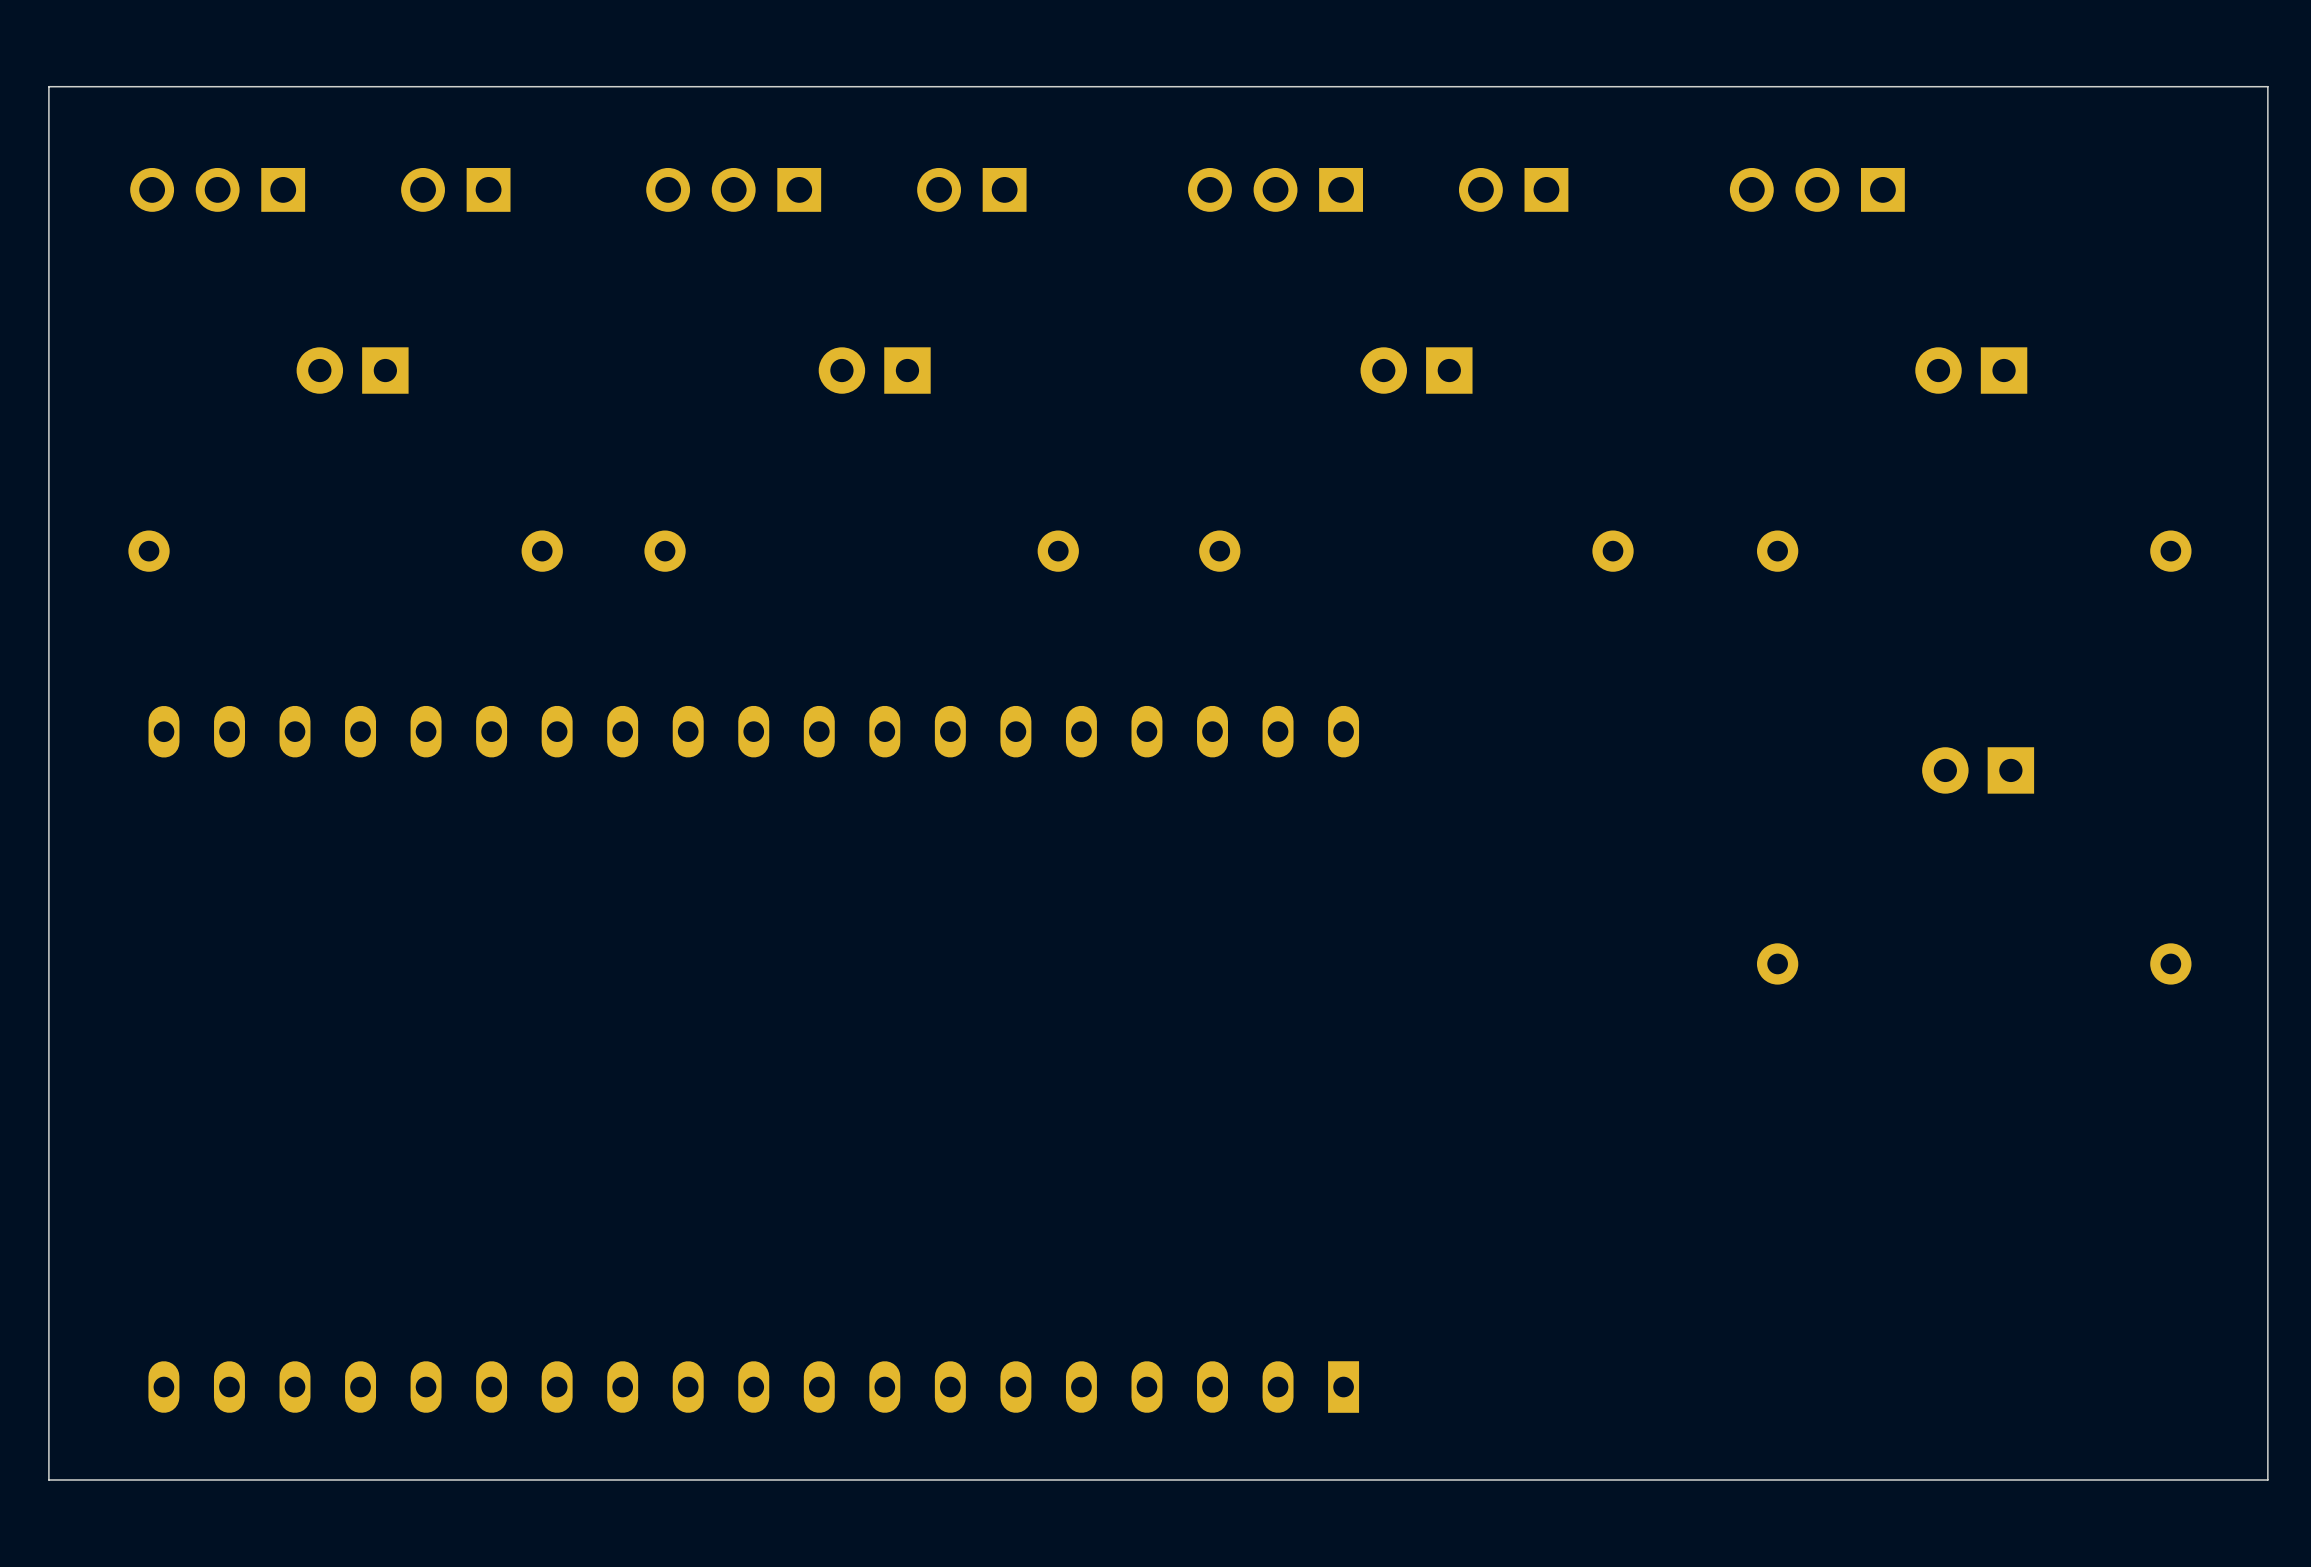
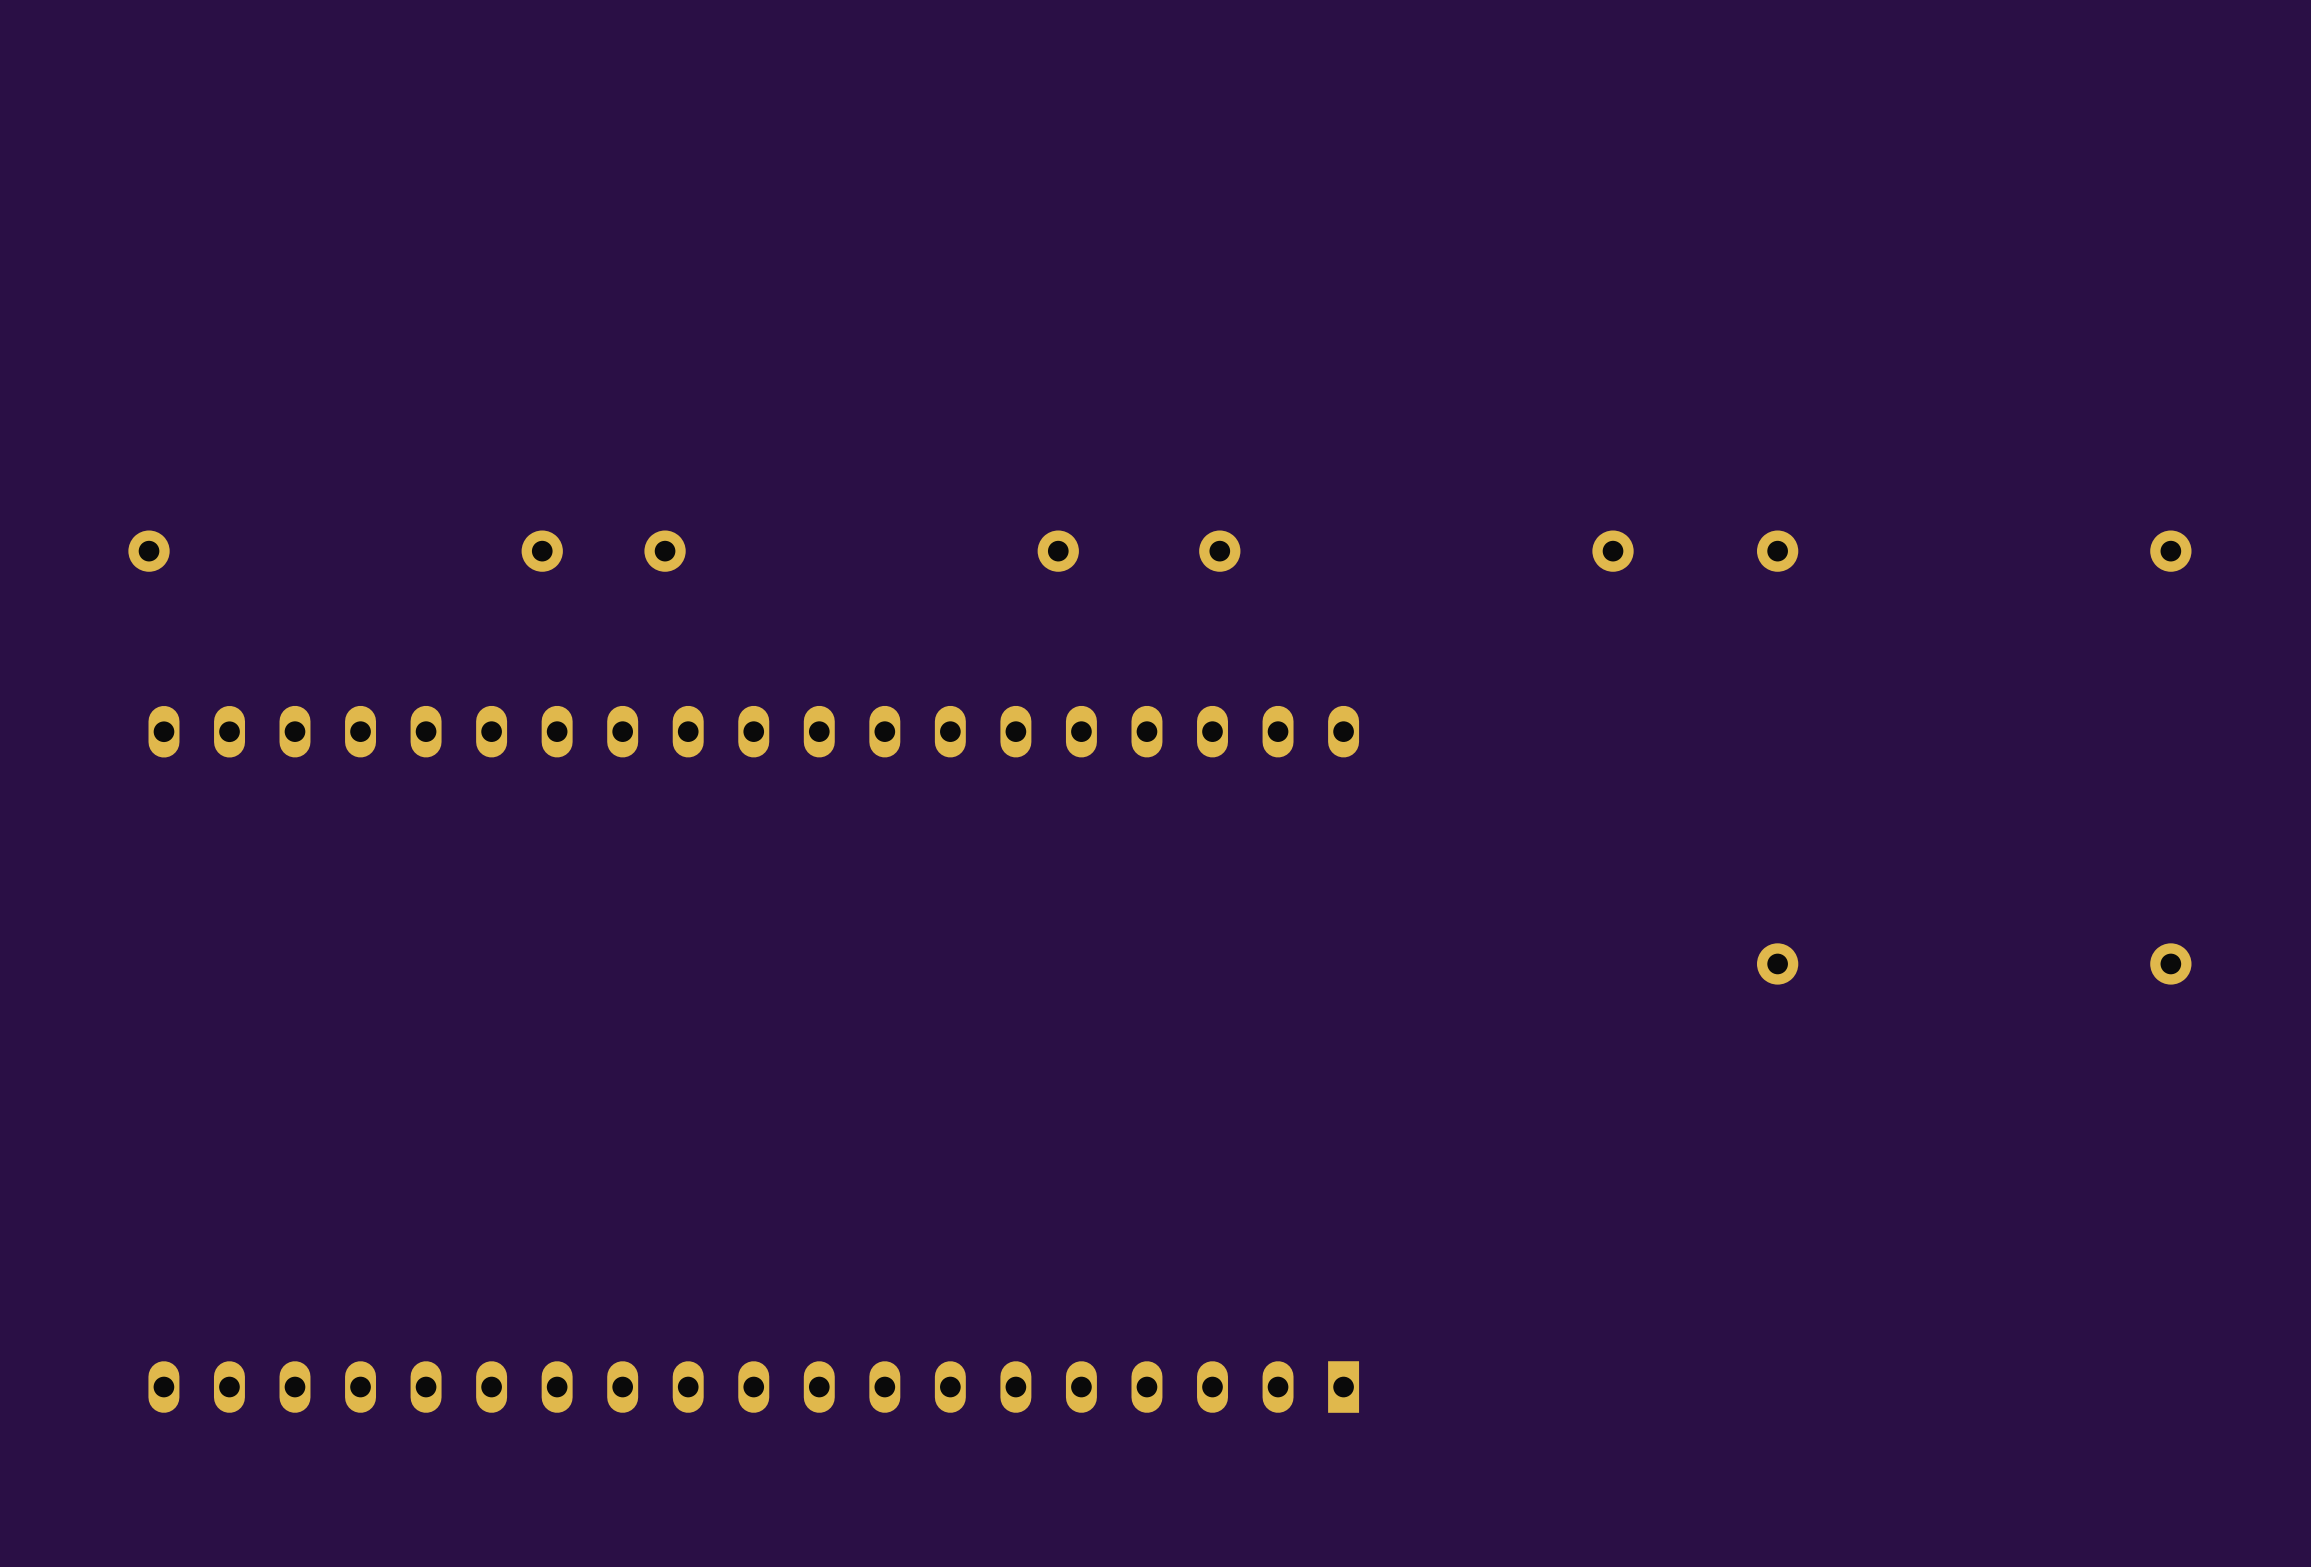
board edge: (2267, 86) (48, 86) (48, 1480) (2267, 1480) (2267, 86) -> none
part: (217, 189) -> none
part: (455, 189) -> none
part: (733, 189) -> none
part: (971, 189) -> none
part: (1275, 189) -> none
part: (1513, 189) -> none
part: (1817, 189) -> none
part: (352, 370) -> none
part: (874, 370) -> none
part: (1416, 370) -> none
part: (1971, 370) -> none
part: (1978, 770) -> none

